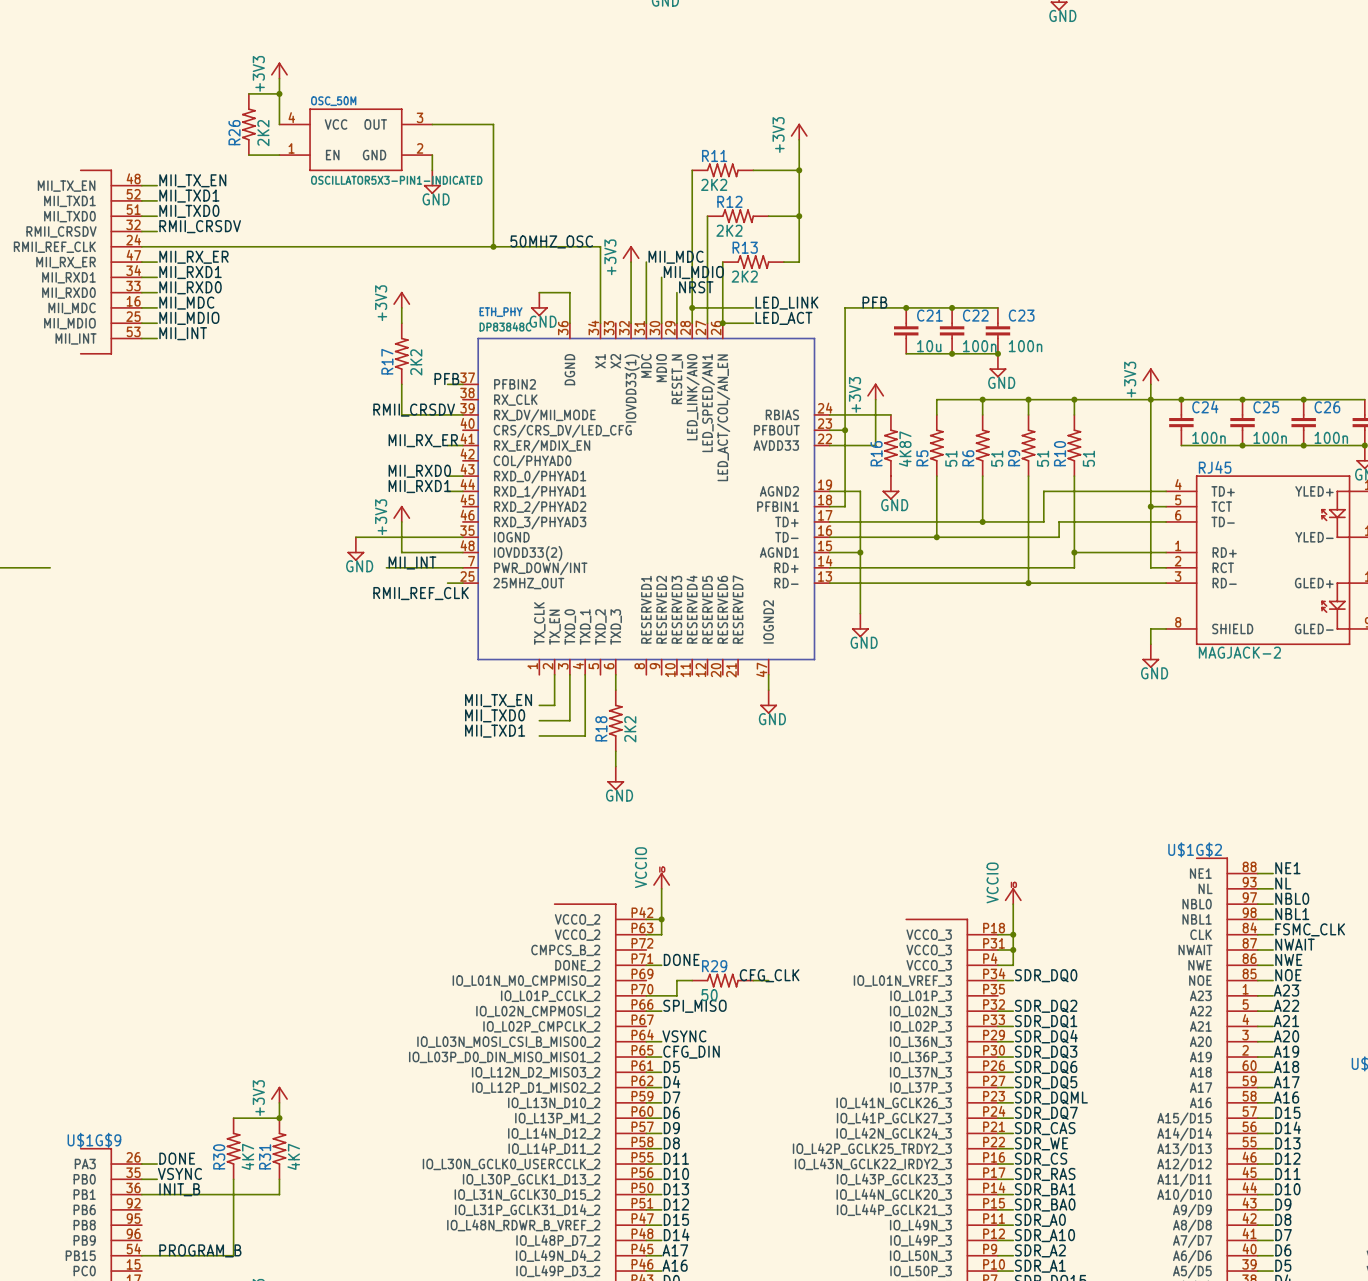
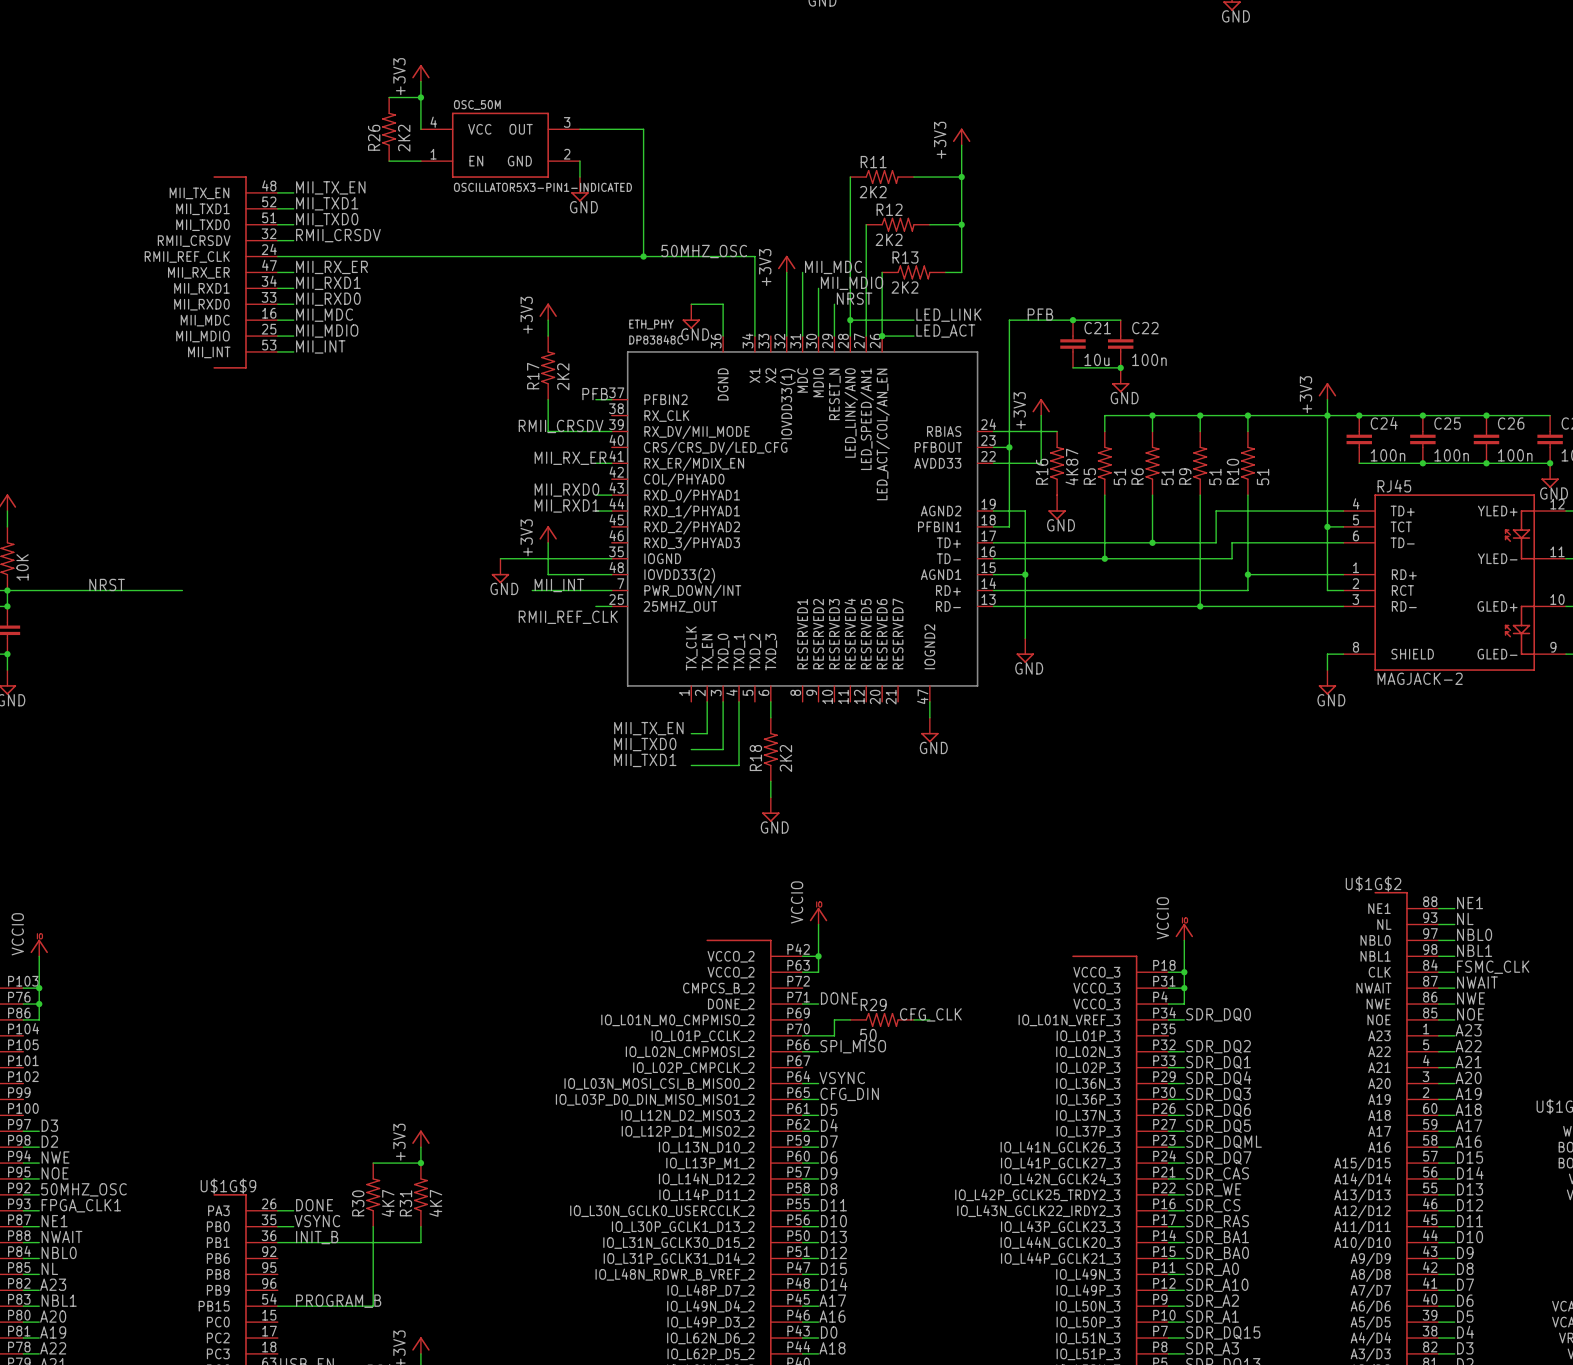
wire: (952, 307) (997, 307) -> none
junction: (952, 307) -> none
C23: 100n (997, 330) -> none
wire: (952, 353) (997, 353) -> none
junction: (997, 353) -> none
power symbol position: GND (997, 365) -> GND (1120, 380)

